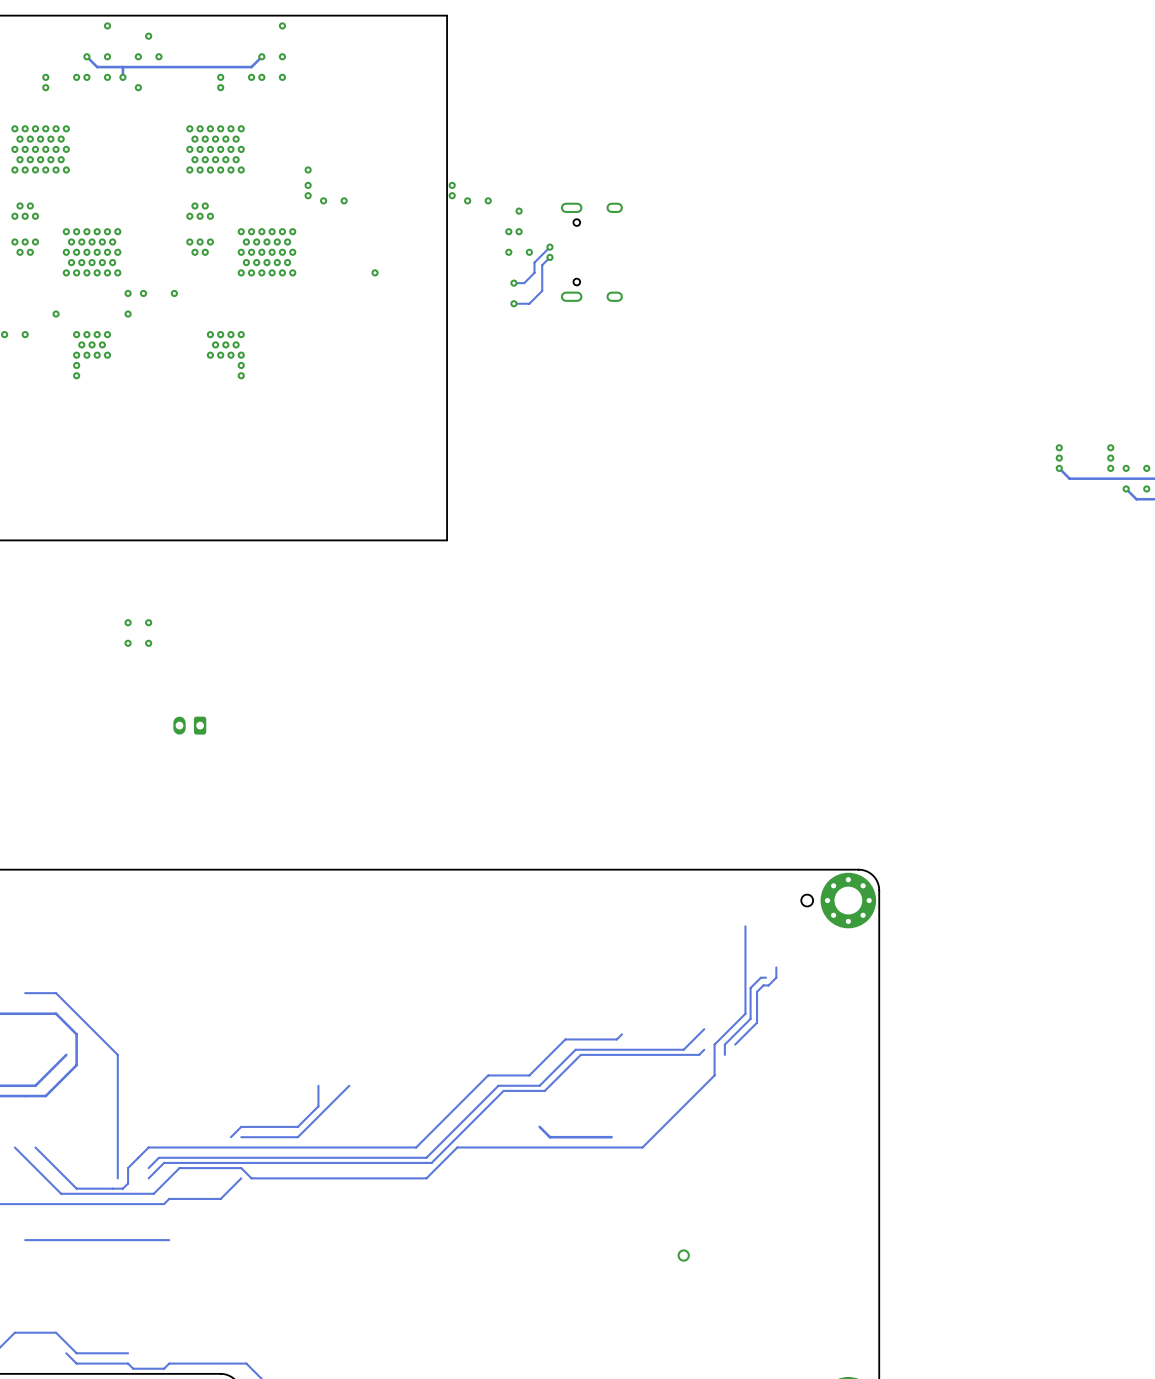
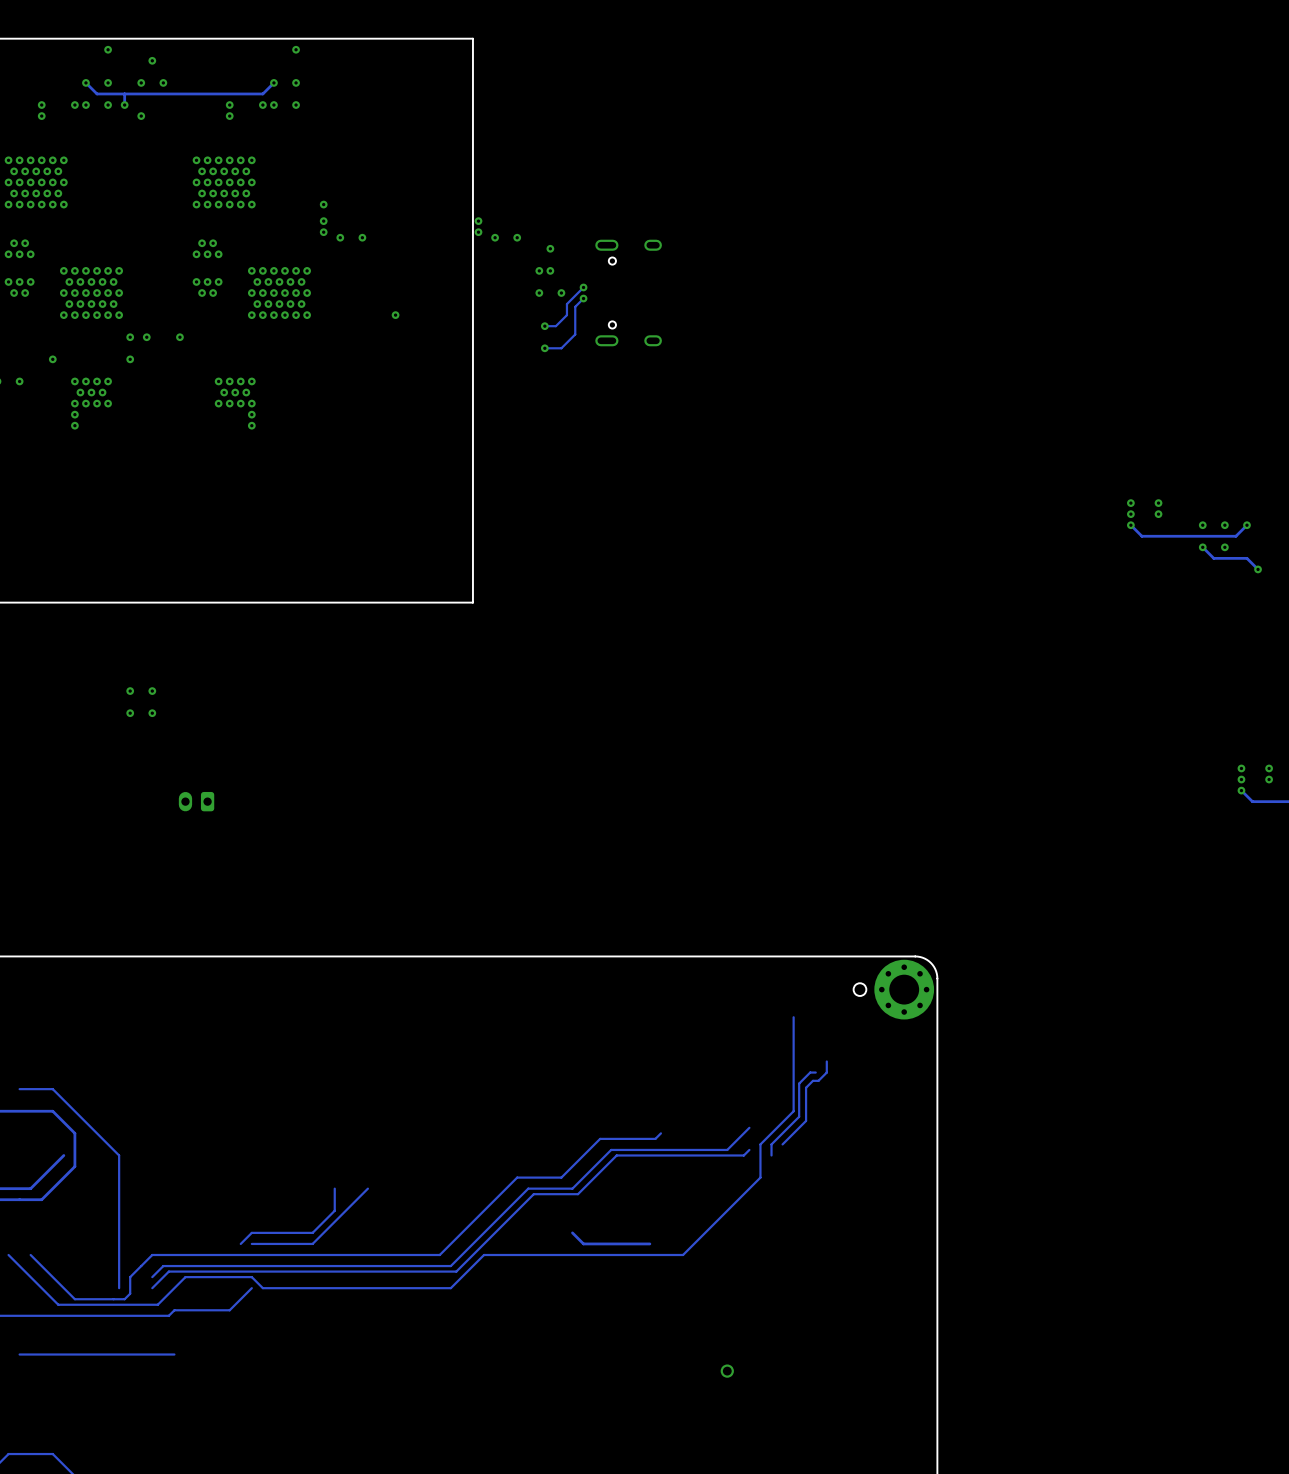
via: none -> (1158, 503)
via: (1110, 447) -> none
via: none -> (1158, 514)
via: (1110, 458) -> none
via: (1110, 468) -> none

